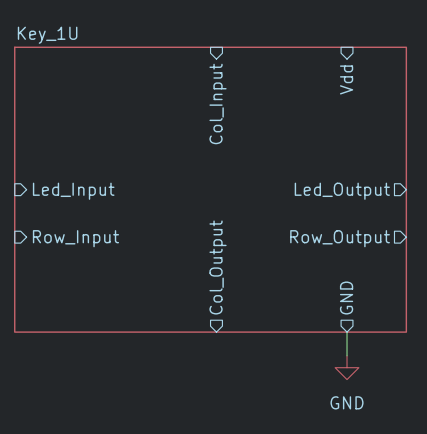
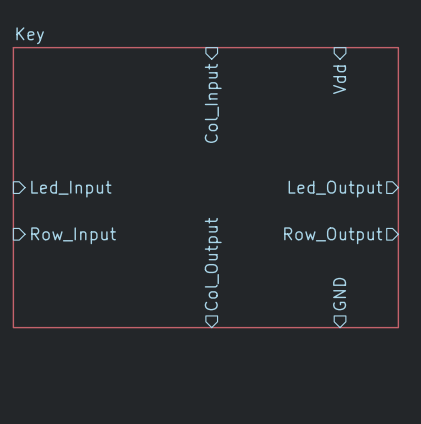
sheet Key_1U name: Key_1U (47, 35) -> Key (30, 35)
wire: (347, 332) (347, 355) -> none
power symbol: GND (347, 367) -> none

